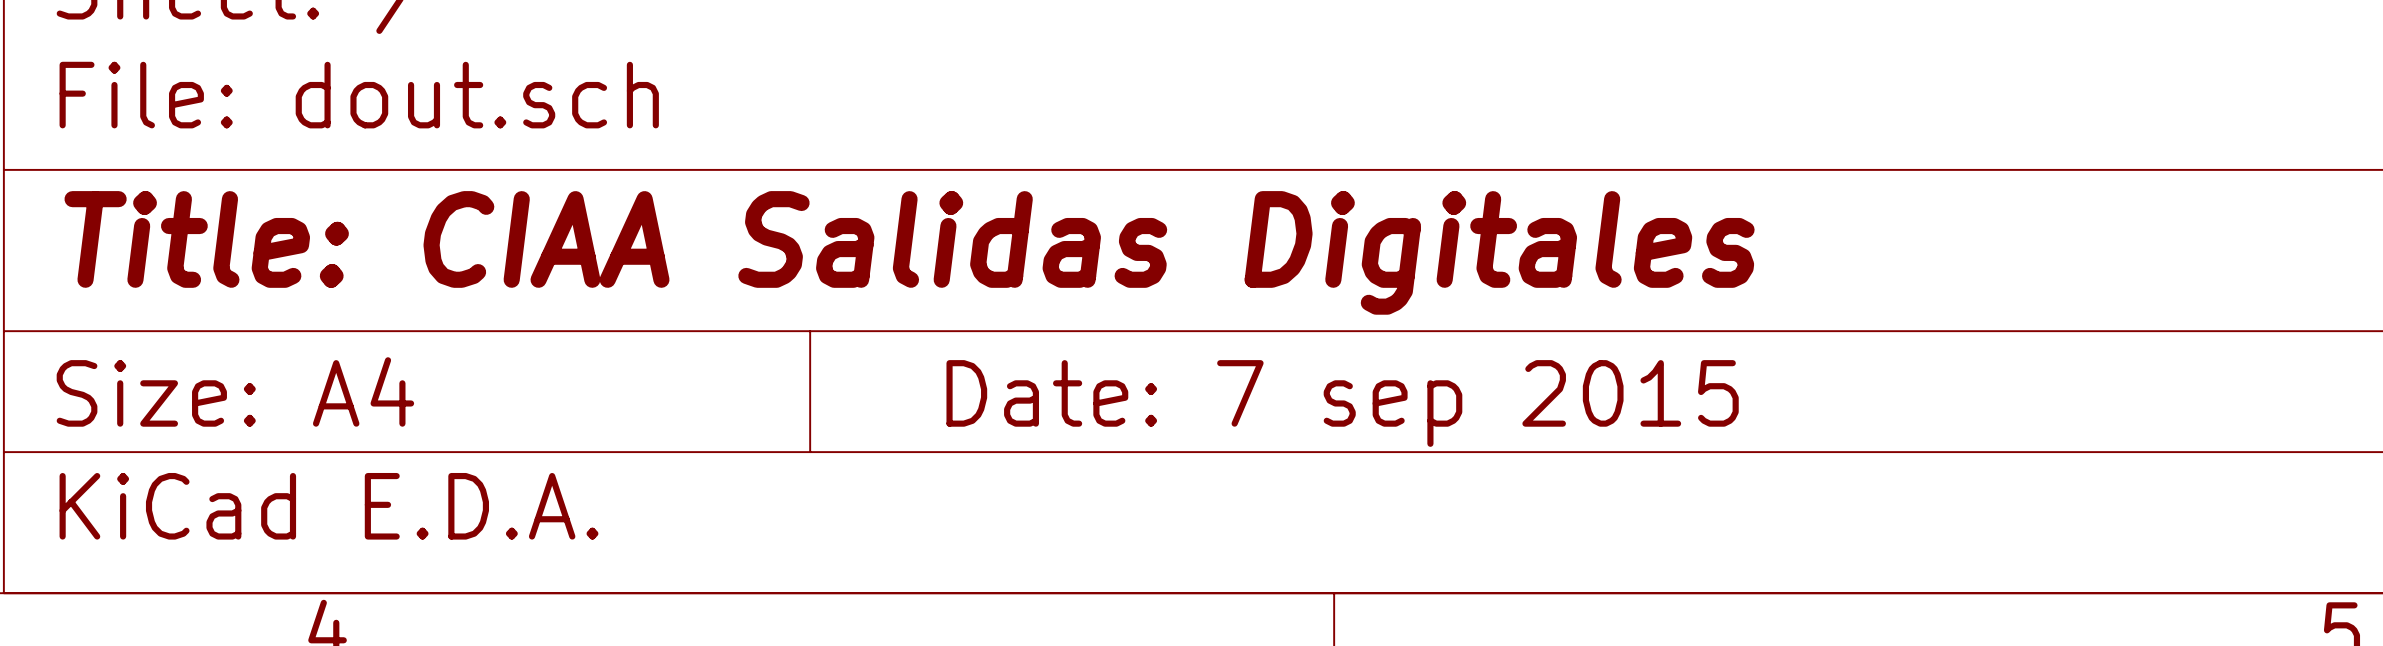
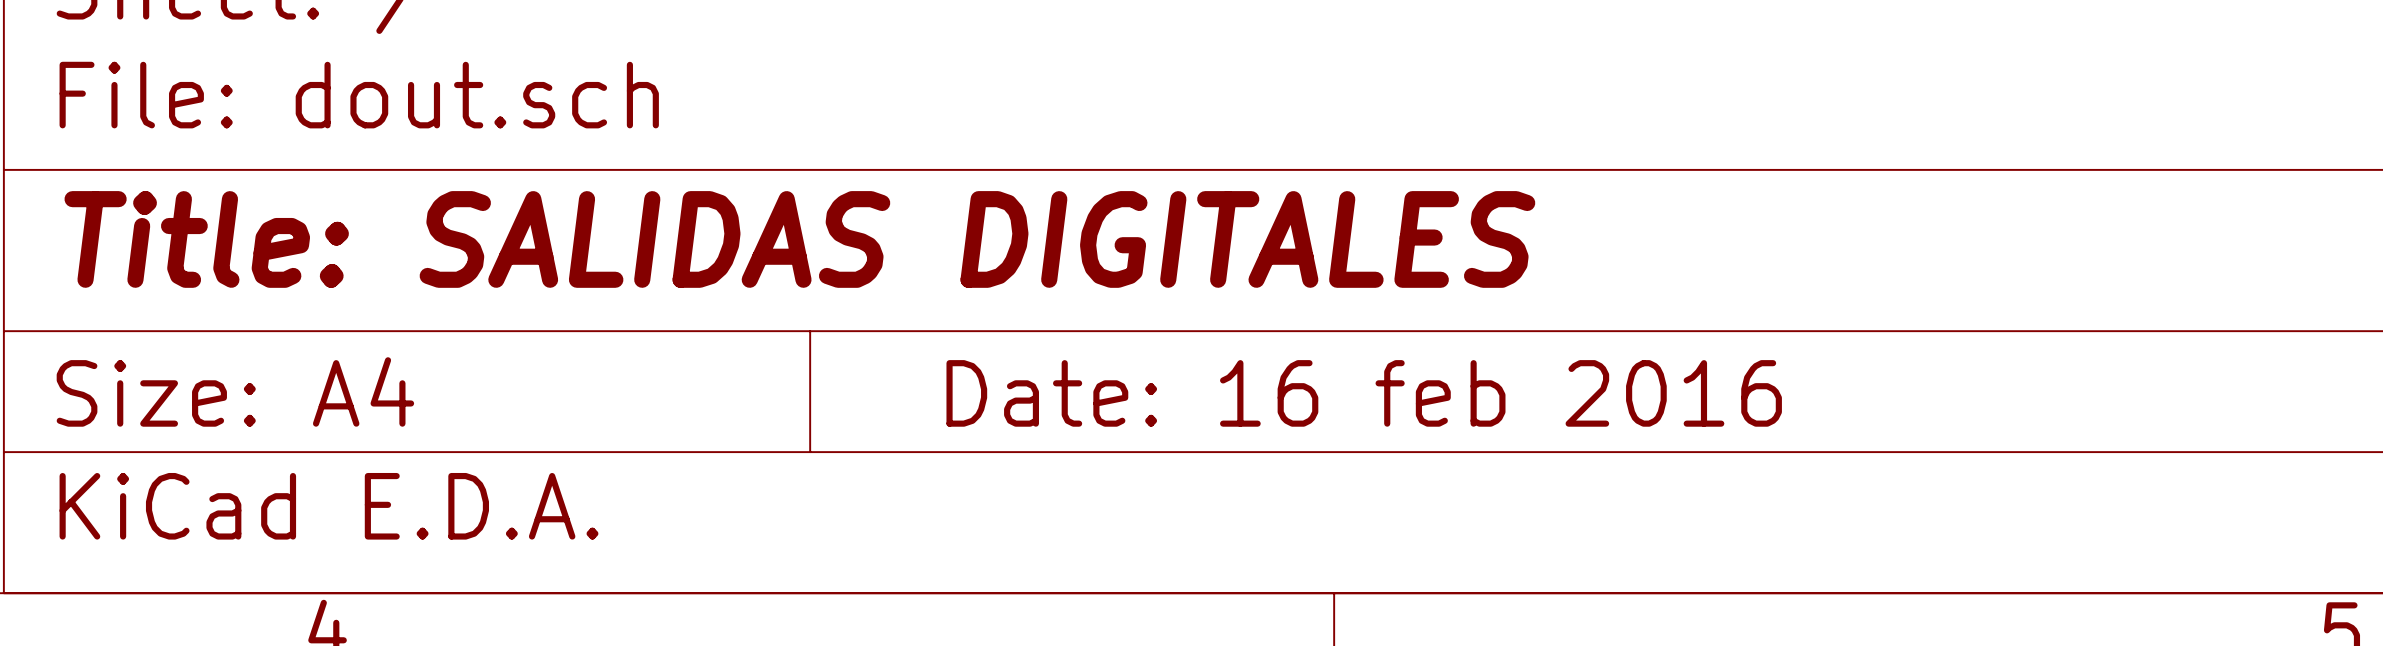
title block: Title: CIAA Salidas Digitales (909, 252) -> Title: SALIDAS DIGITALES (799, 239)
title block: Date: 7 sep 2015 (1342, 403) -> Date: 16 feb 2016 (1364, 393)

